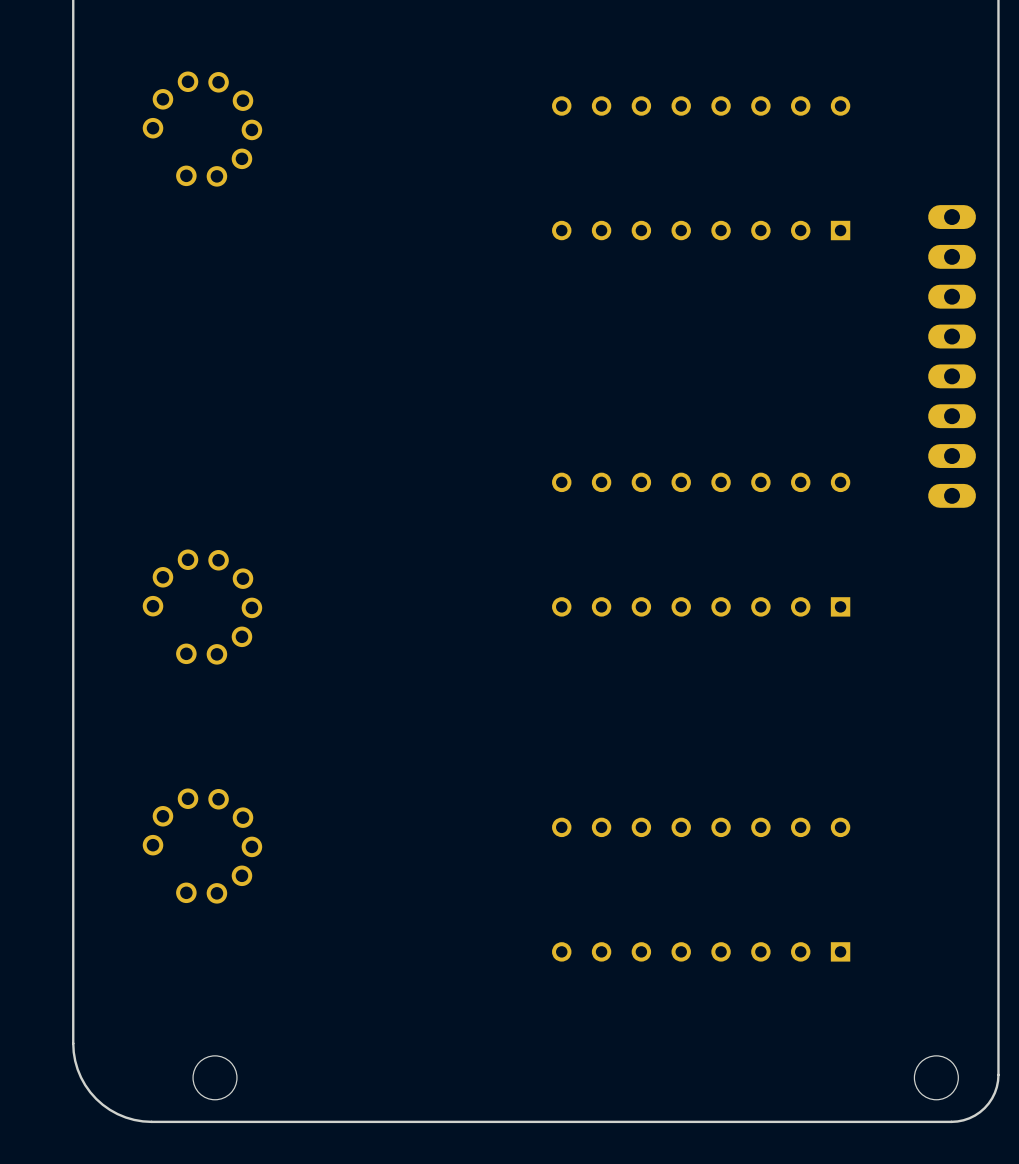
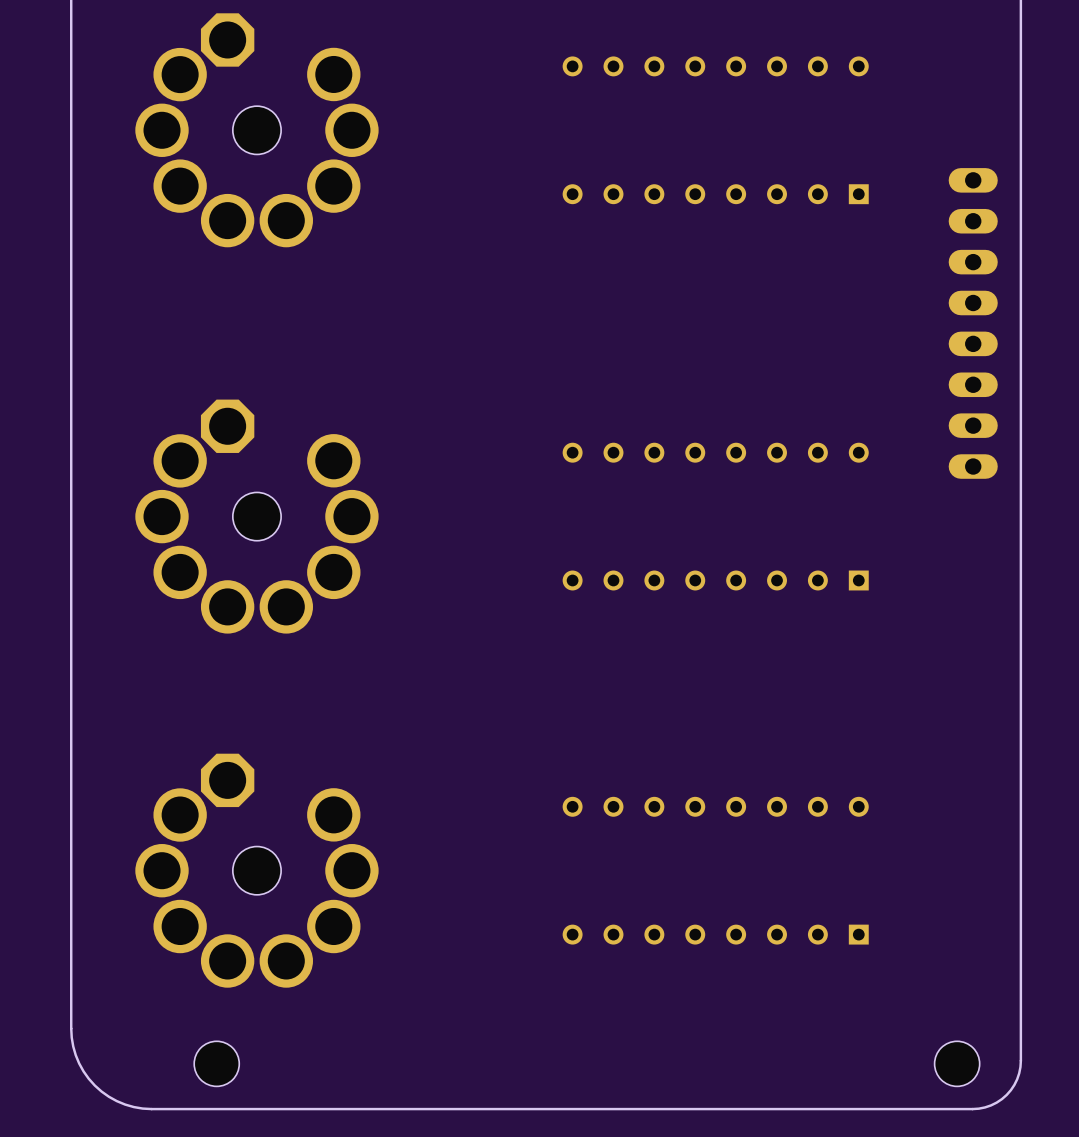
part: (202, 129) -> none
part: none -> (256, 130)
part: none -> (256, 516)
part: (202, 607) -> none
part: (202, 846) -> none
part: none -> (256, 870)

